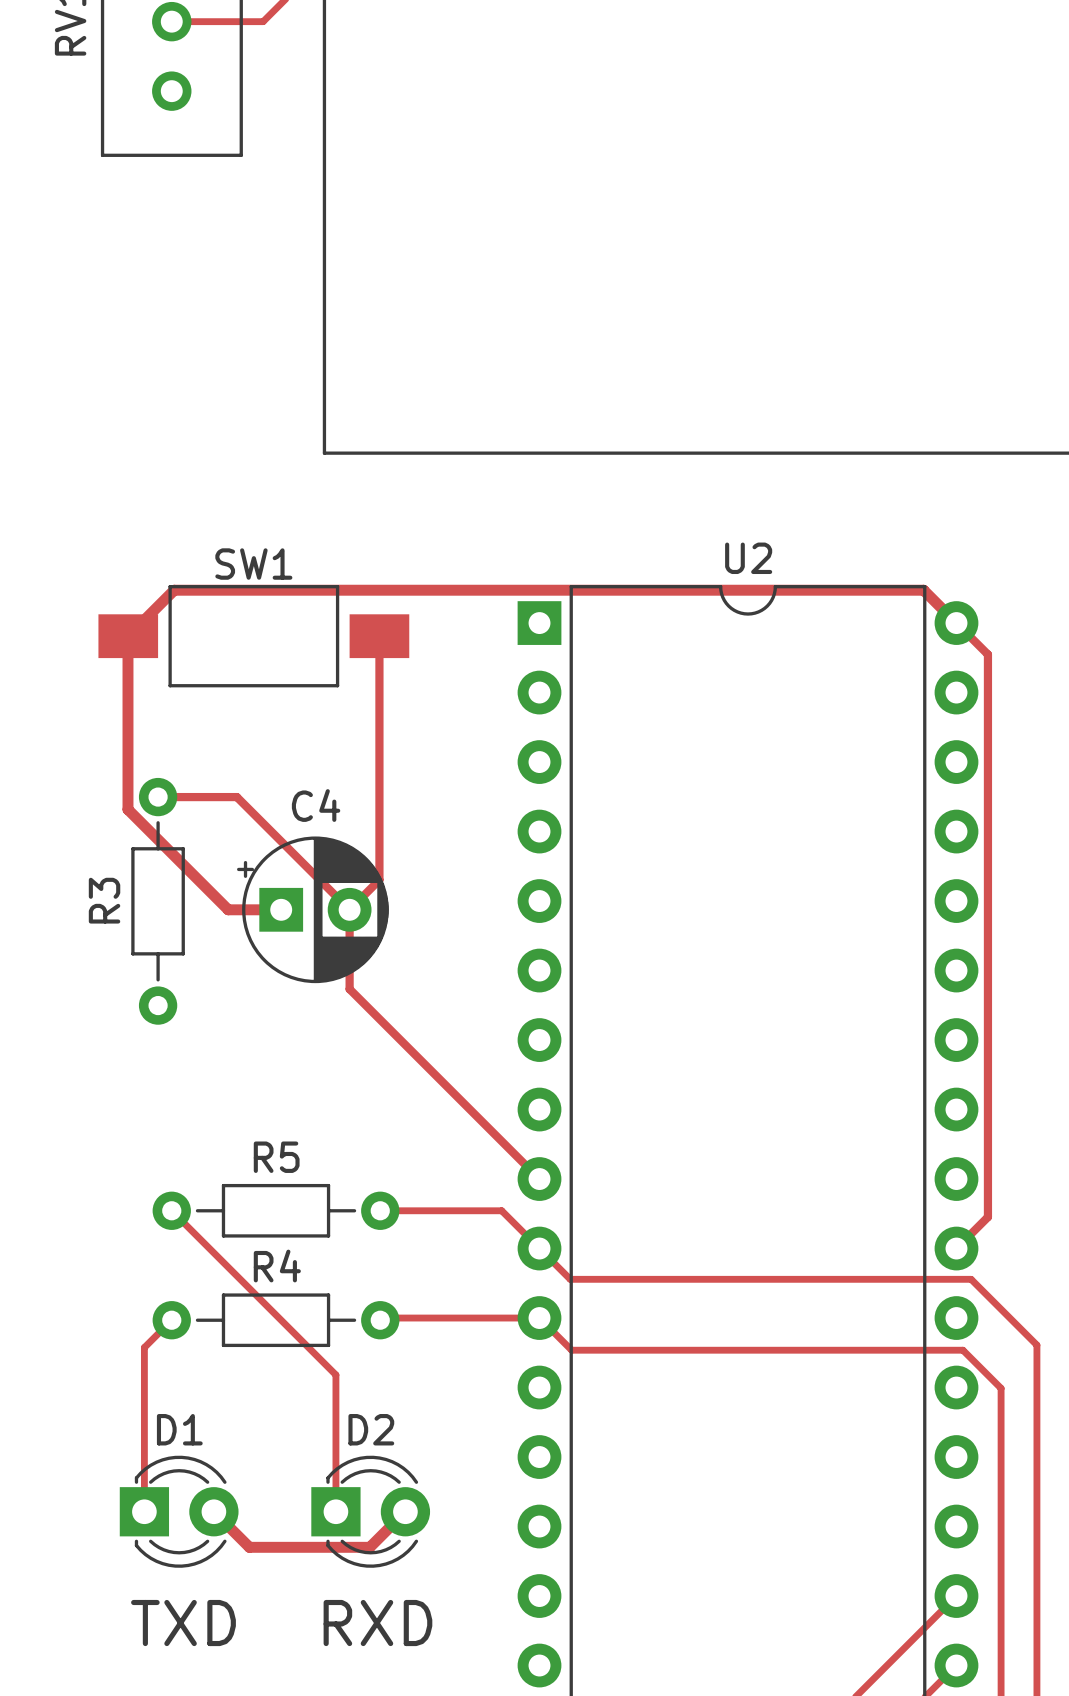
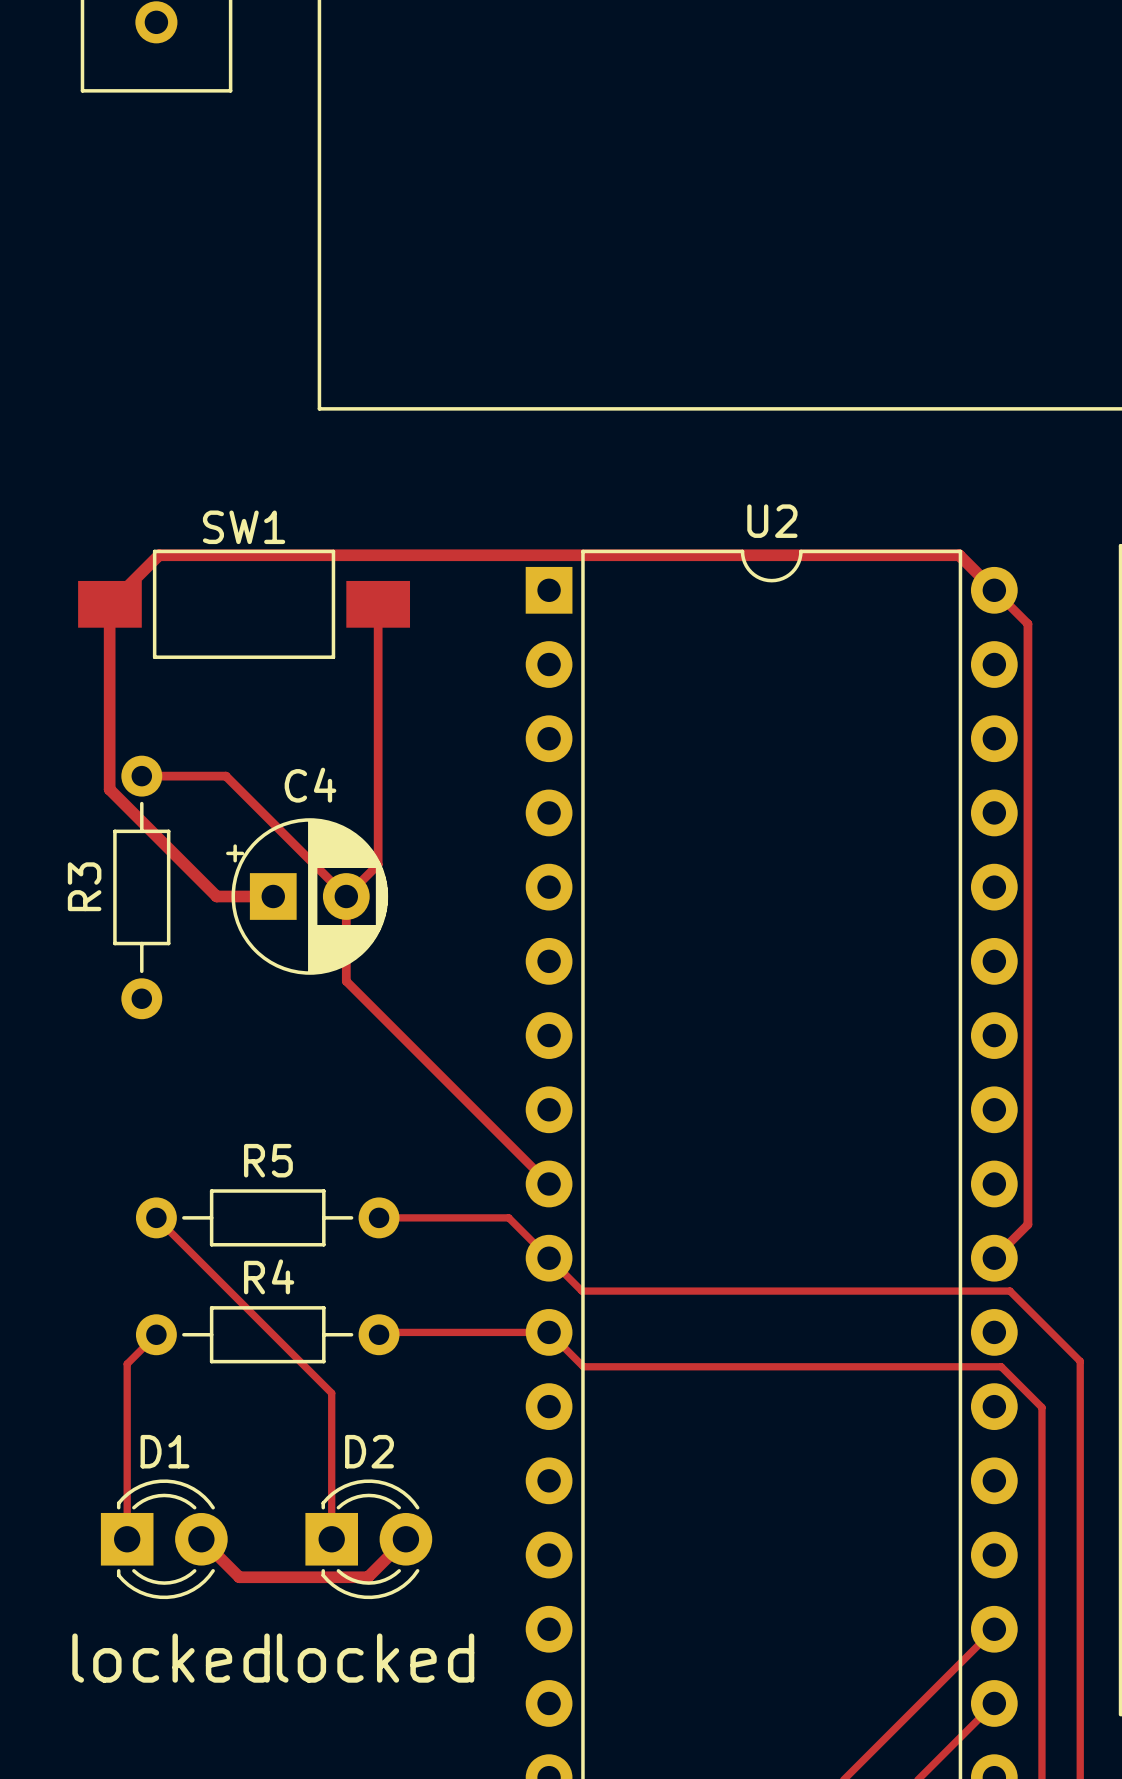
text: TXD (183, 1623) -> locked (171, 1658)
text: RXD (377, 1623) -> locked (375, 1658)

